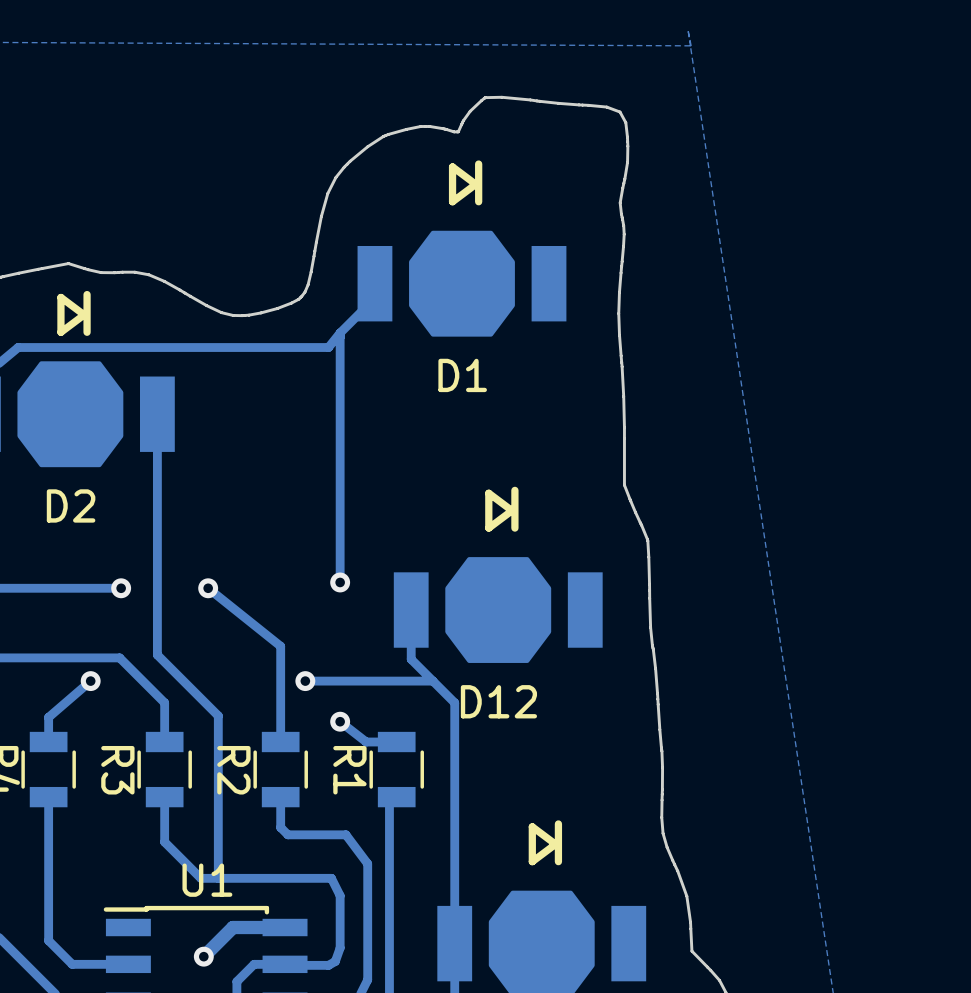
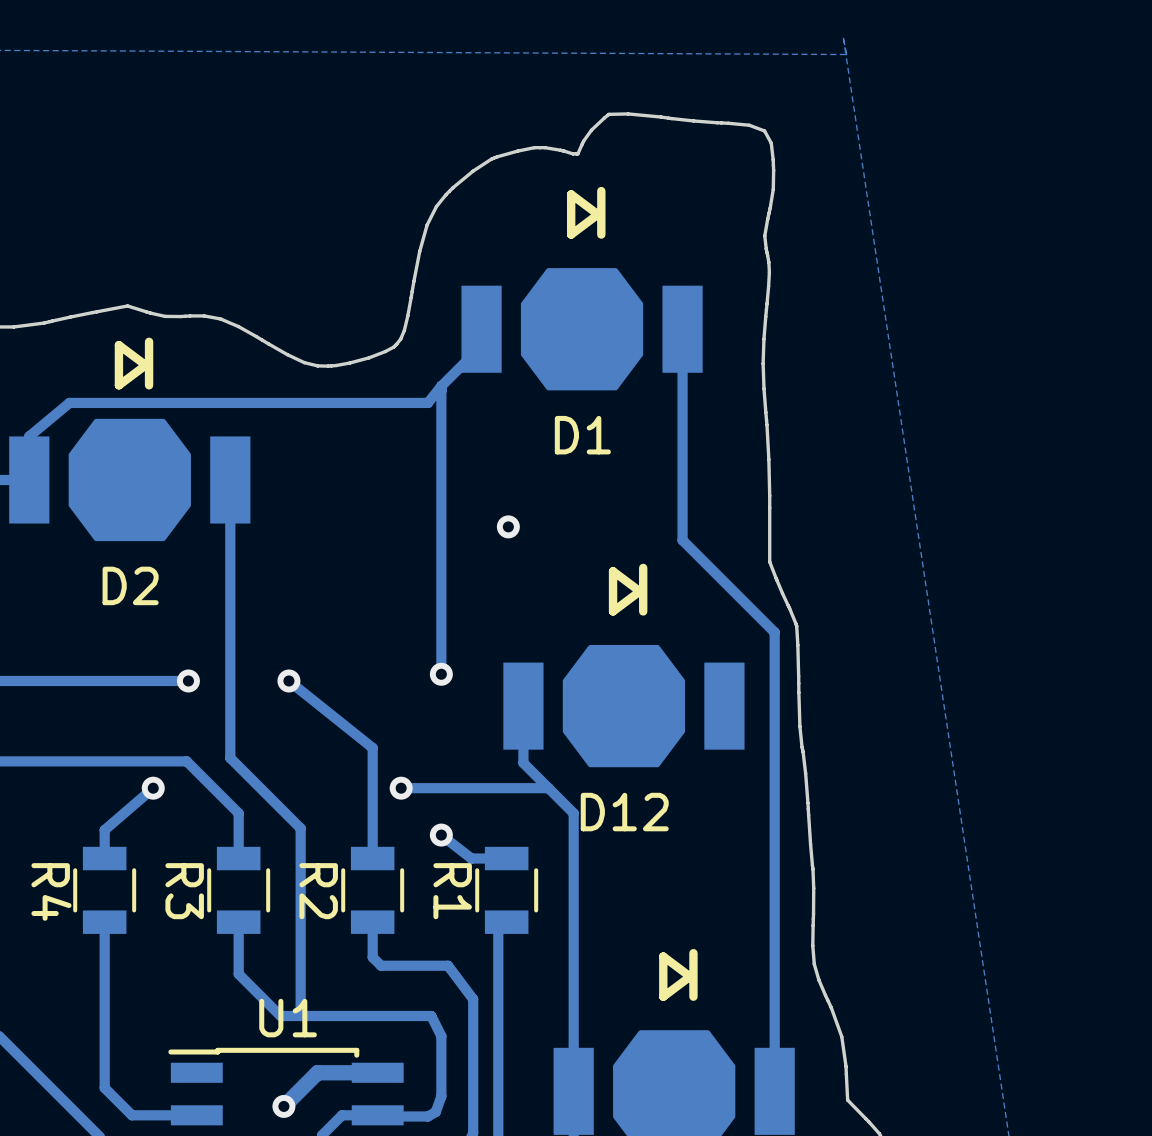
track: none -> (682, 329) (682, 540) (774, 632) (774, 1091)
via: none -> (508, 526)

